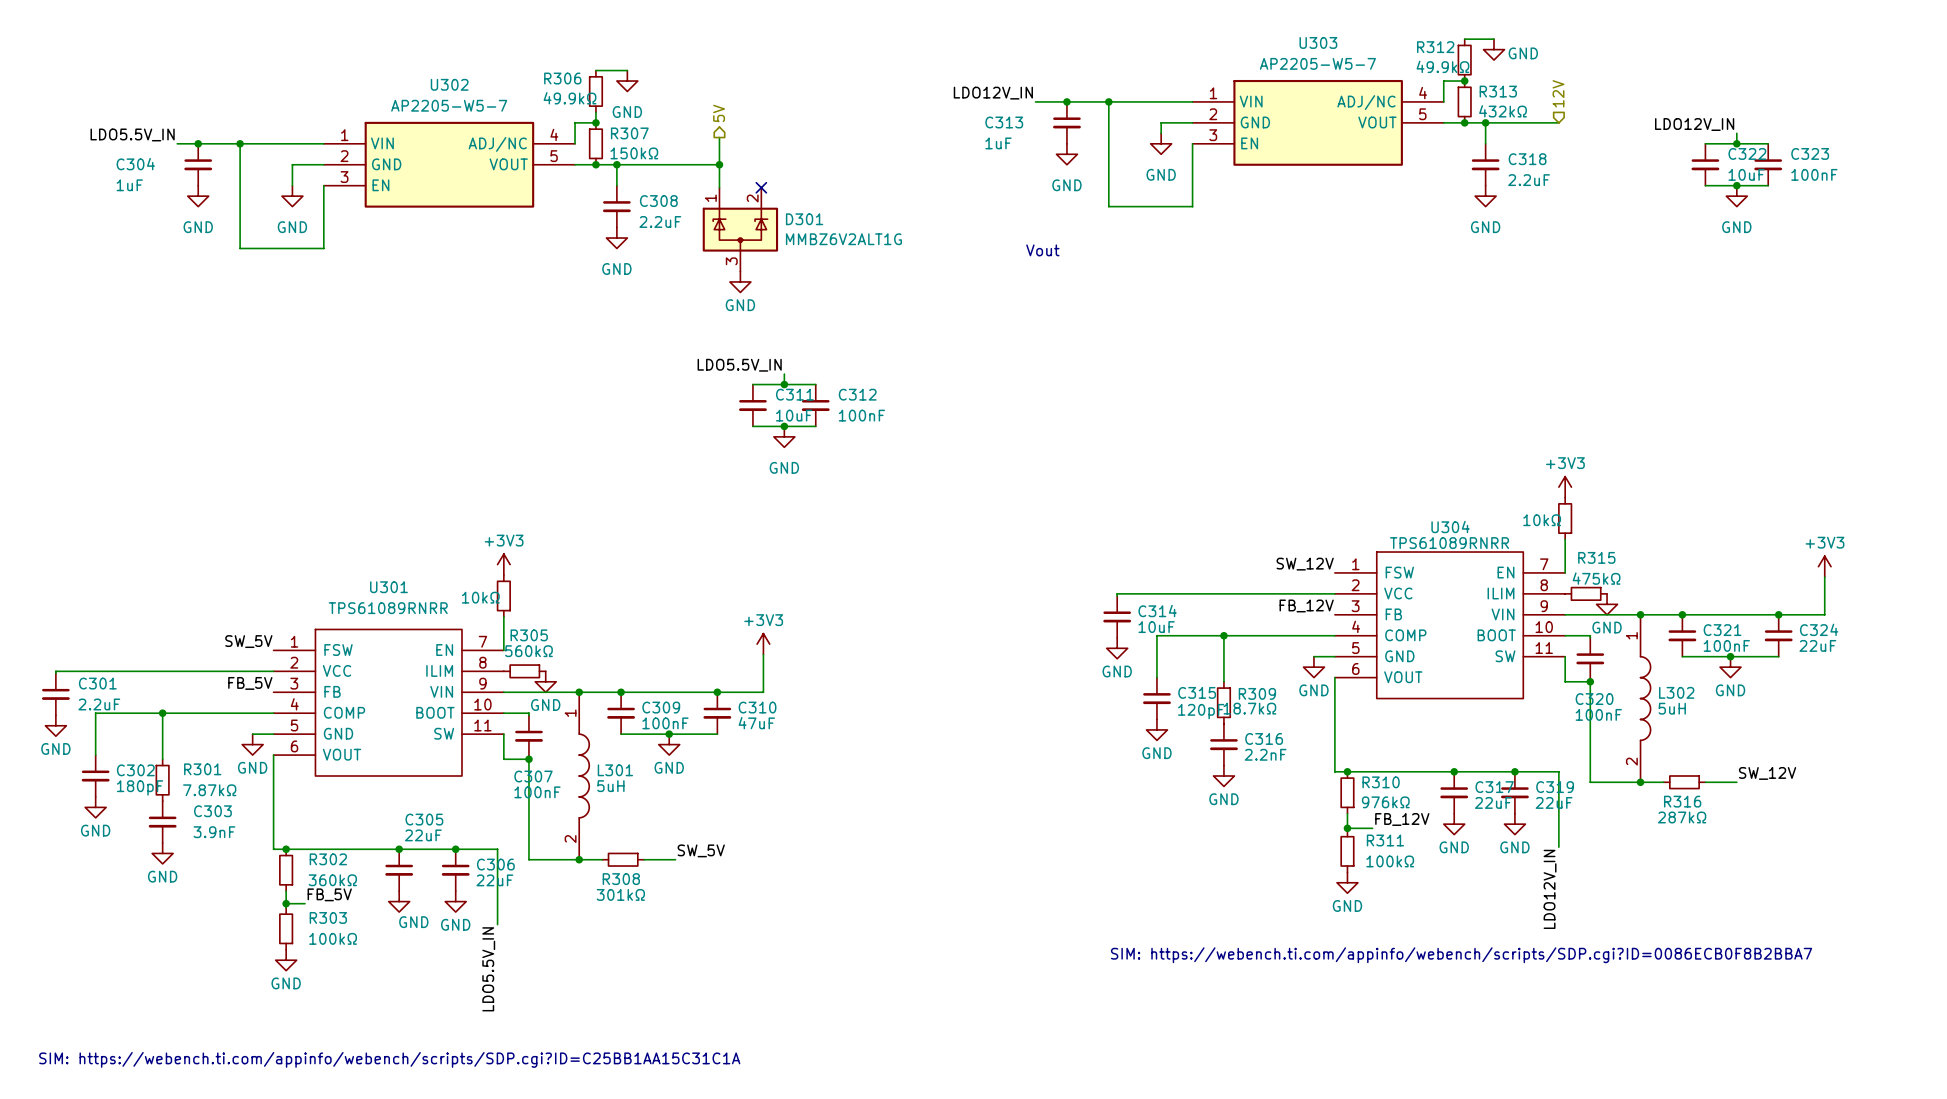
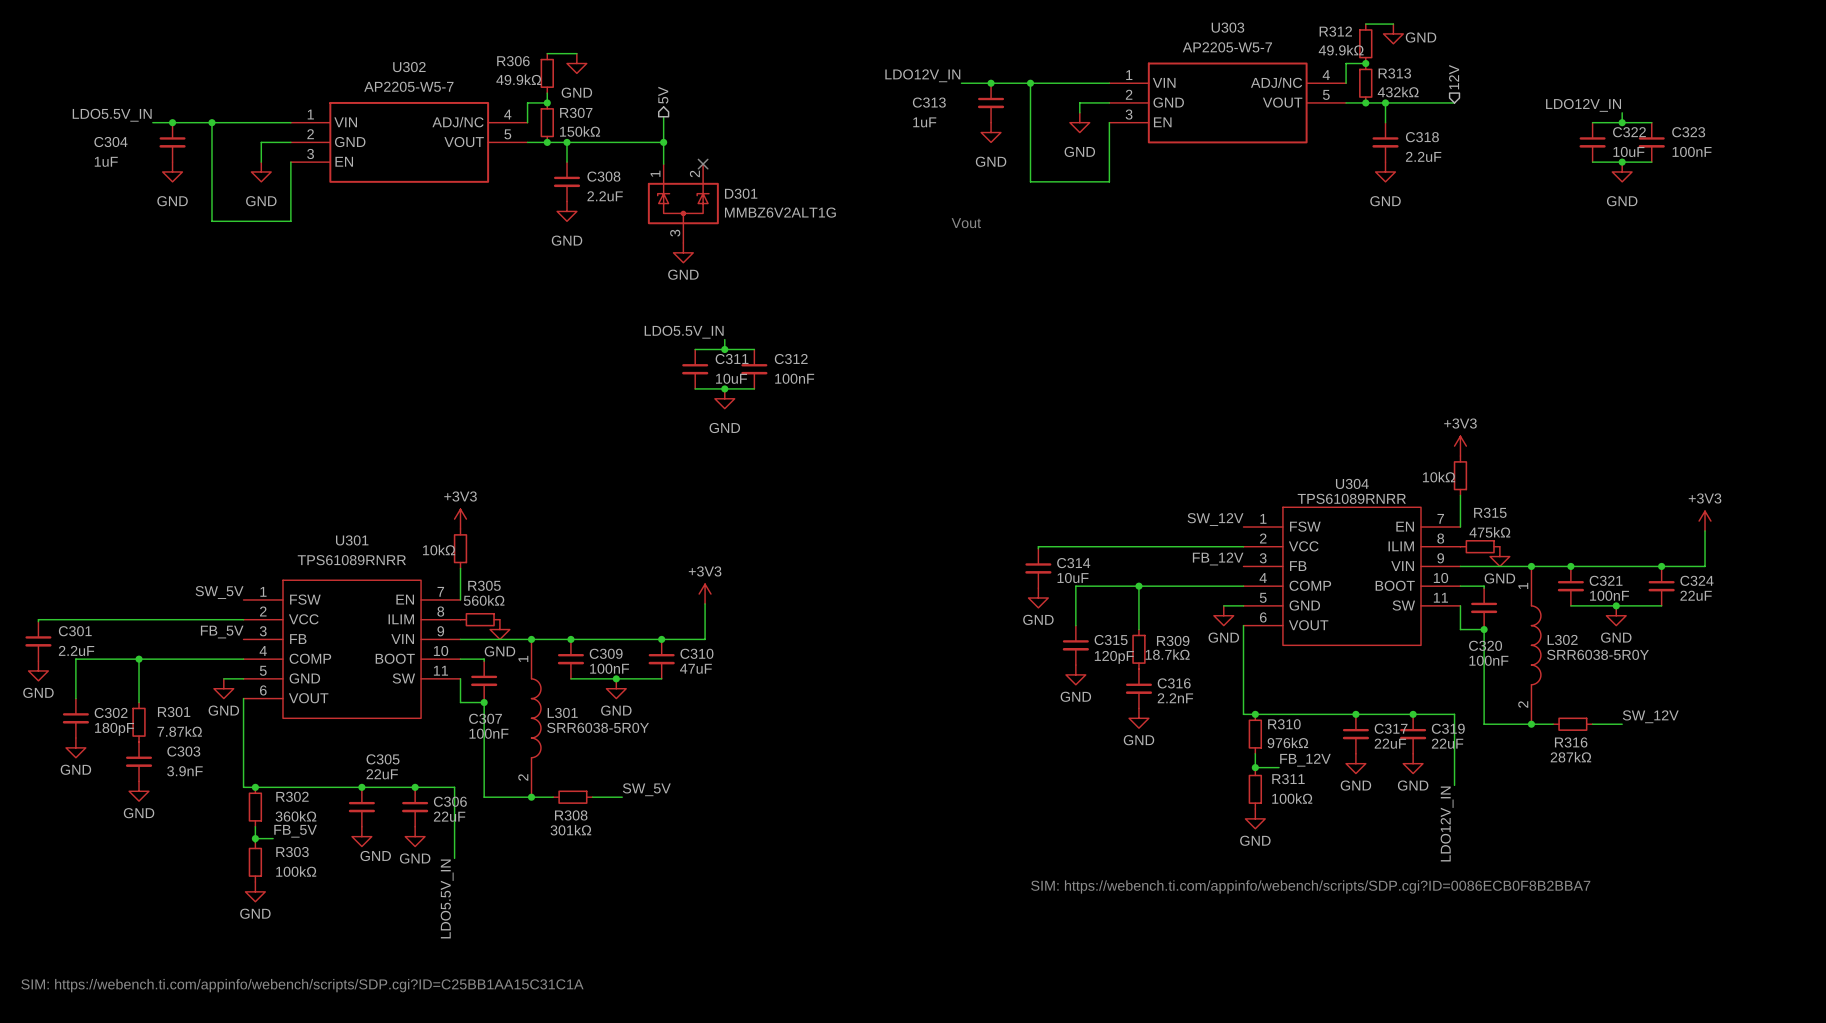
L302 value: 5uH (1672, 708) -> SRR6038-5R0Y (1598, 654)
L301 value: 5uH (610, 786) -> SRR6038-5R0Y (598, 727)

